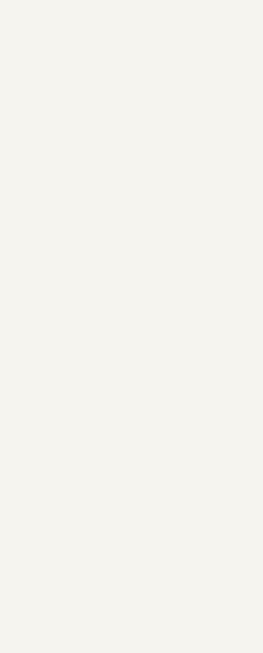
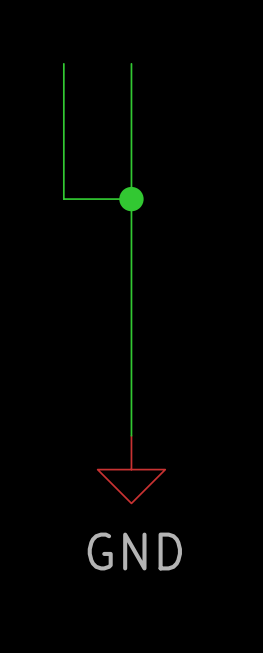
wire: none -> (63, 63) (63, 199) (131, 199)
wire: none -> (131, 63) (131, 435)
junction: none -> (131, 199)
power symbol: none -> GND (131, 469)

